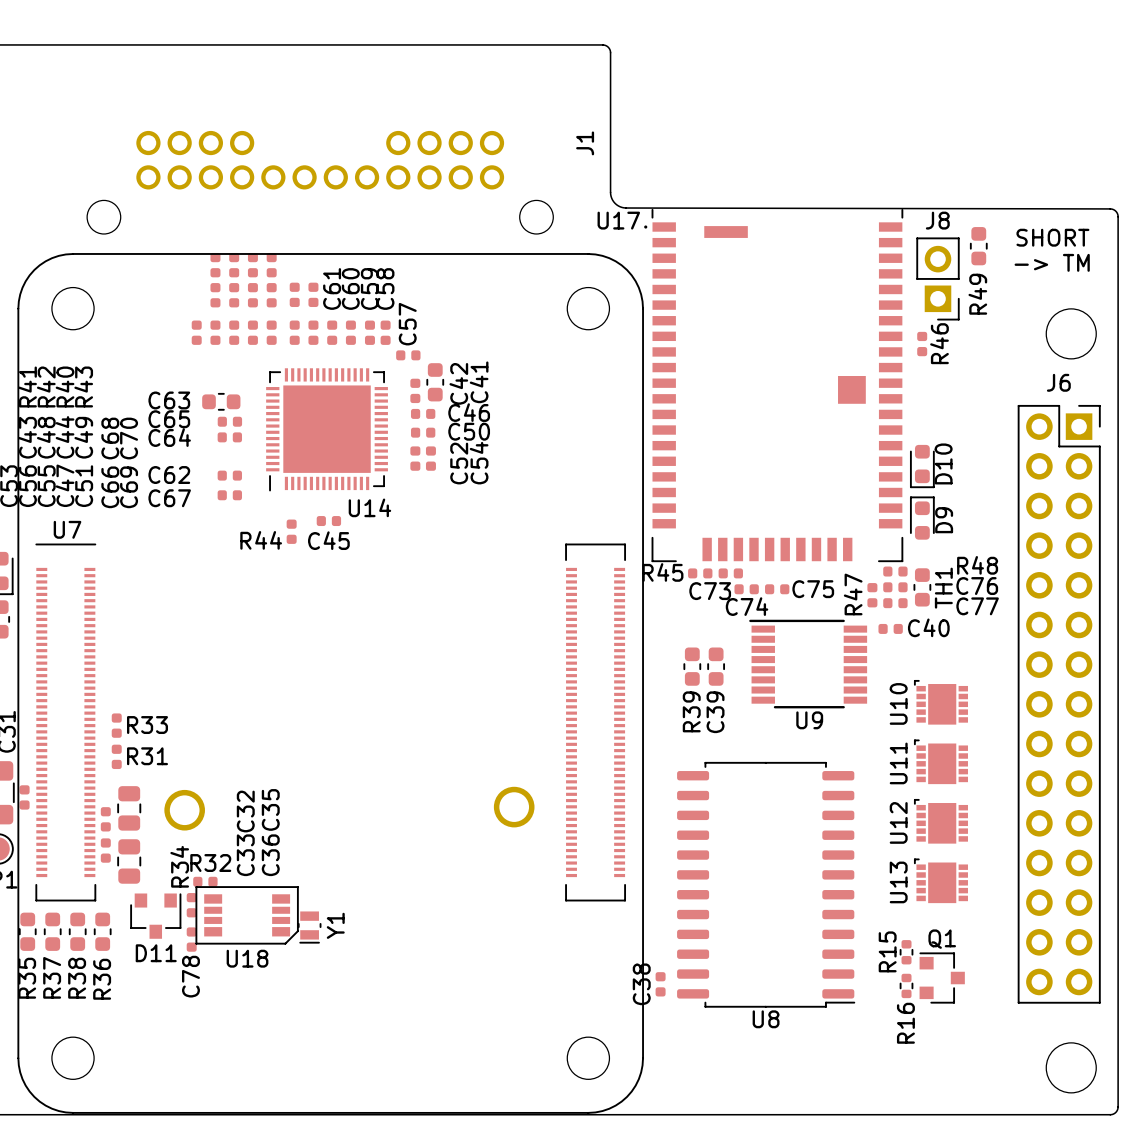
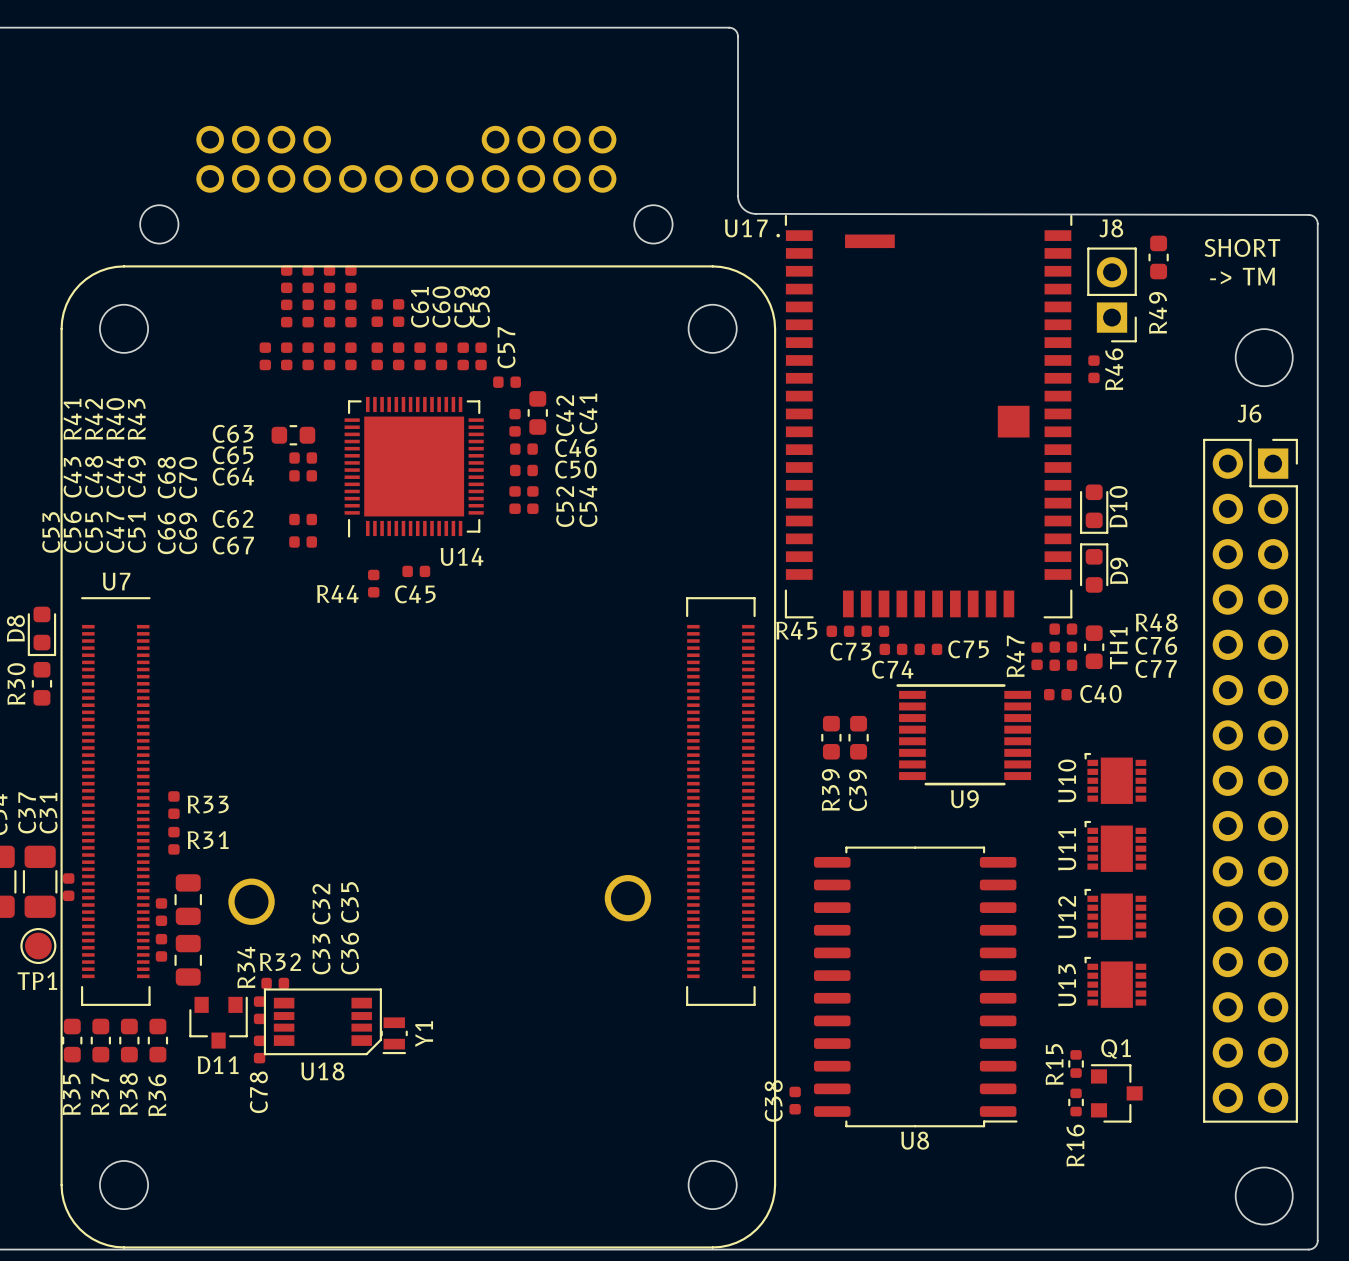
J1 name: J1 (585, 143) -> none

